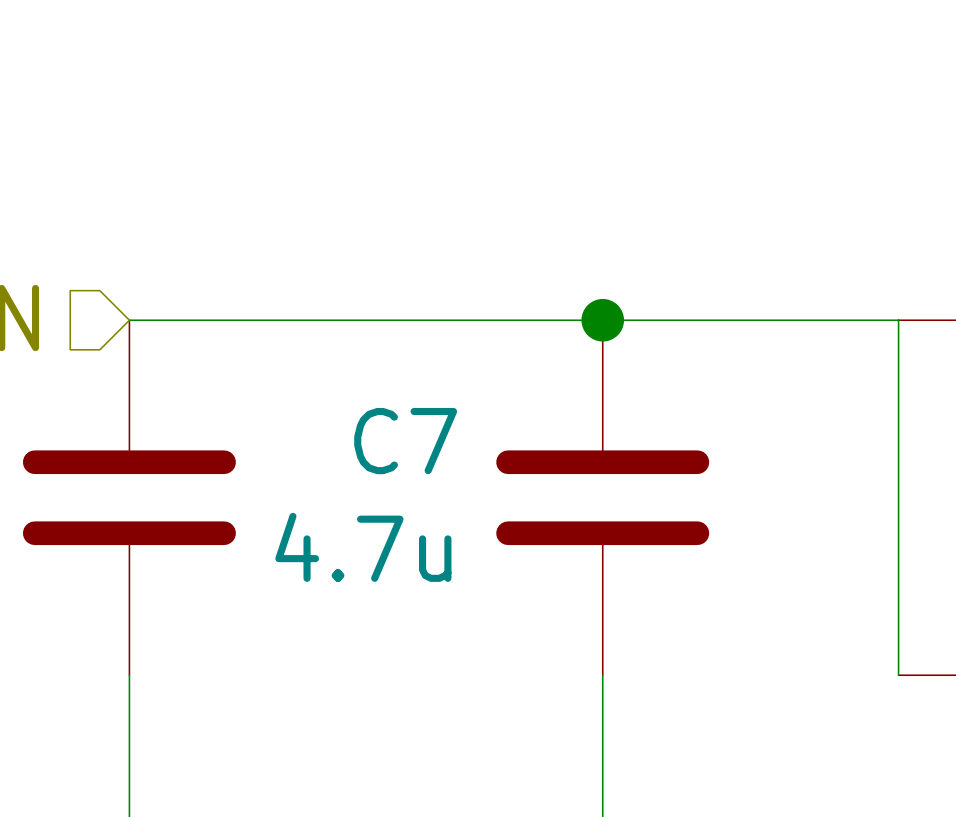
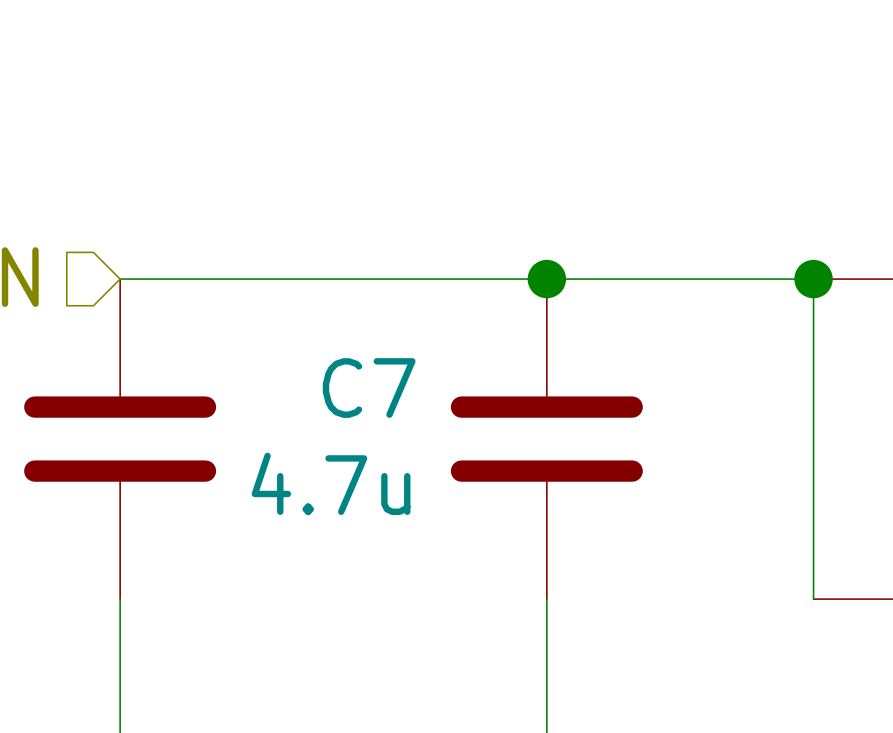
junction: none -> (813, 279)

